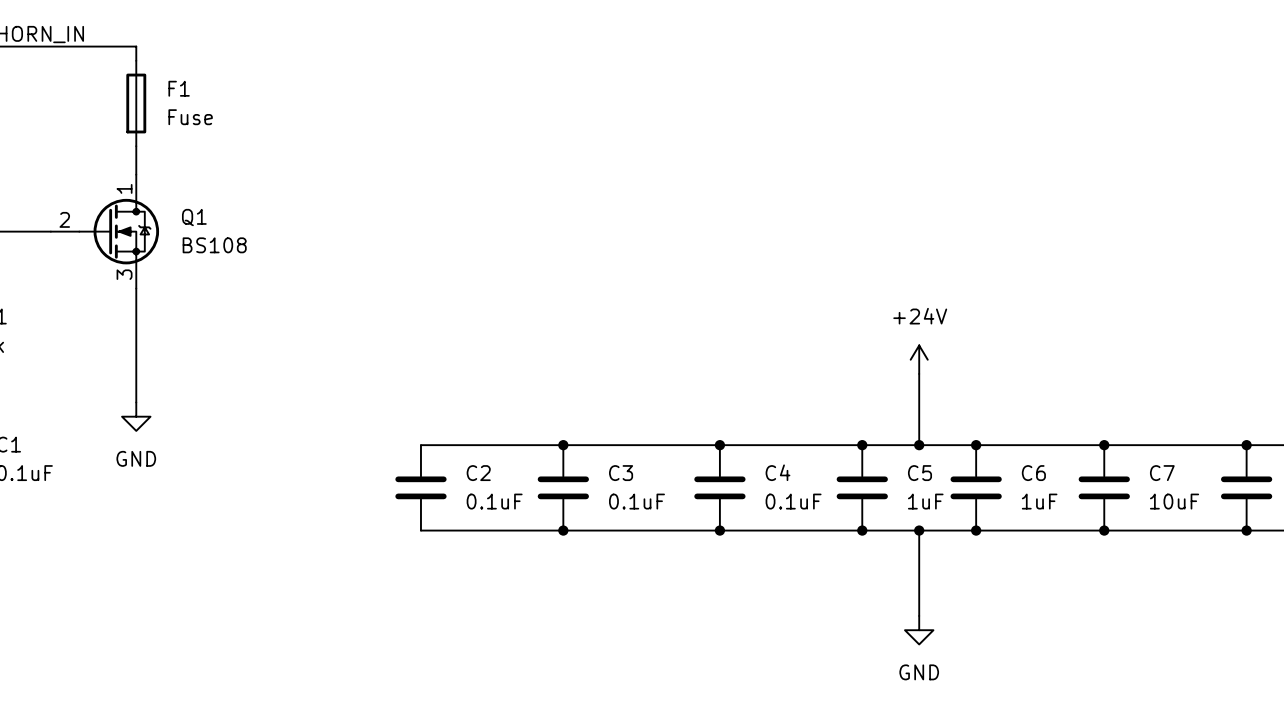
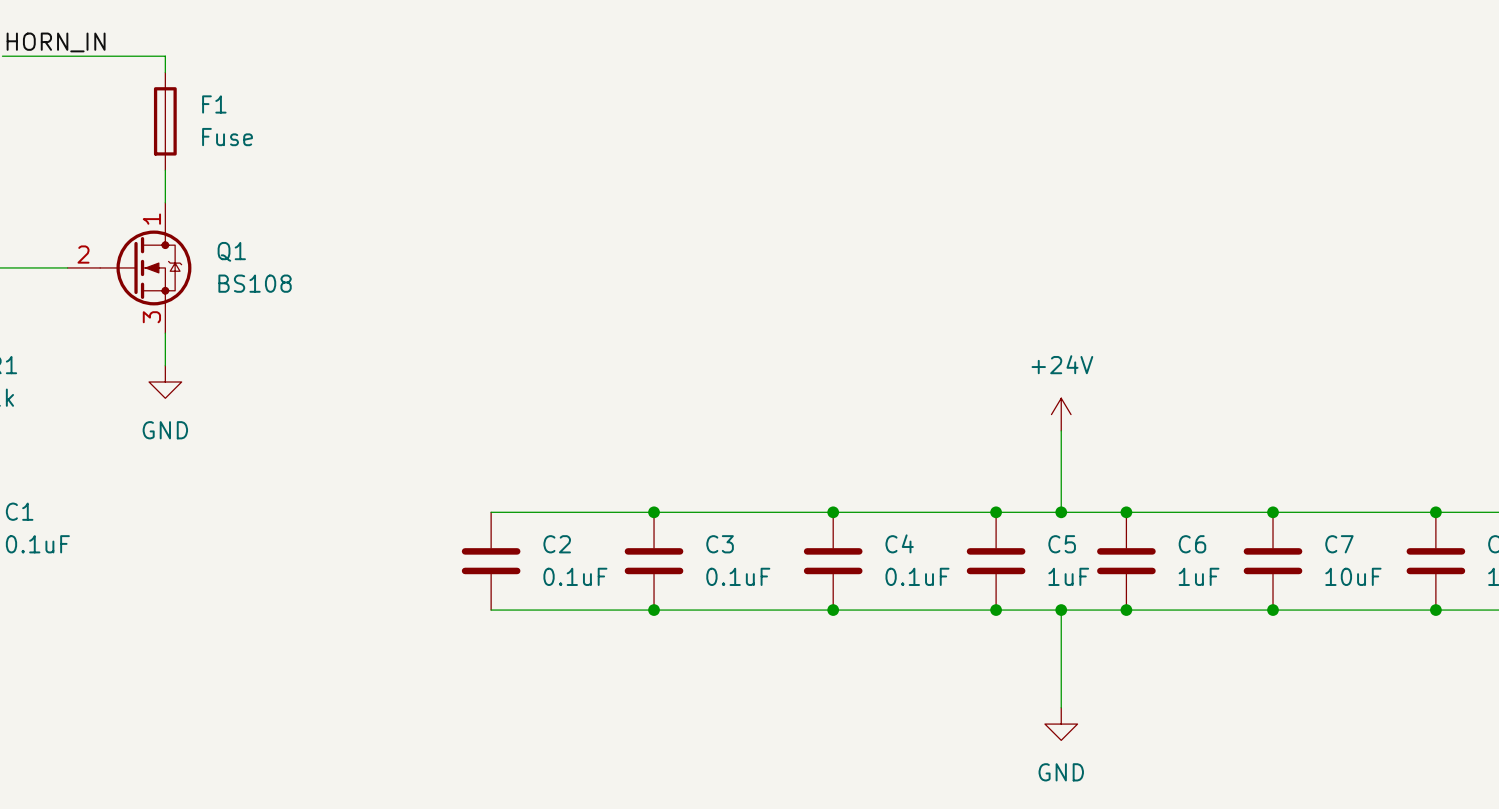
wire: (136, 317) (136, 402) -> none
power symbol position: GND (136, 416) -> GND (165, 382)

